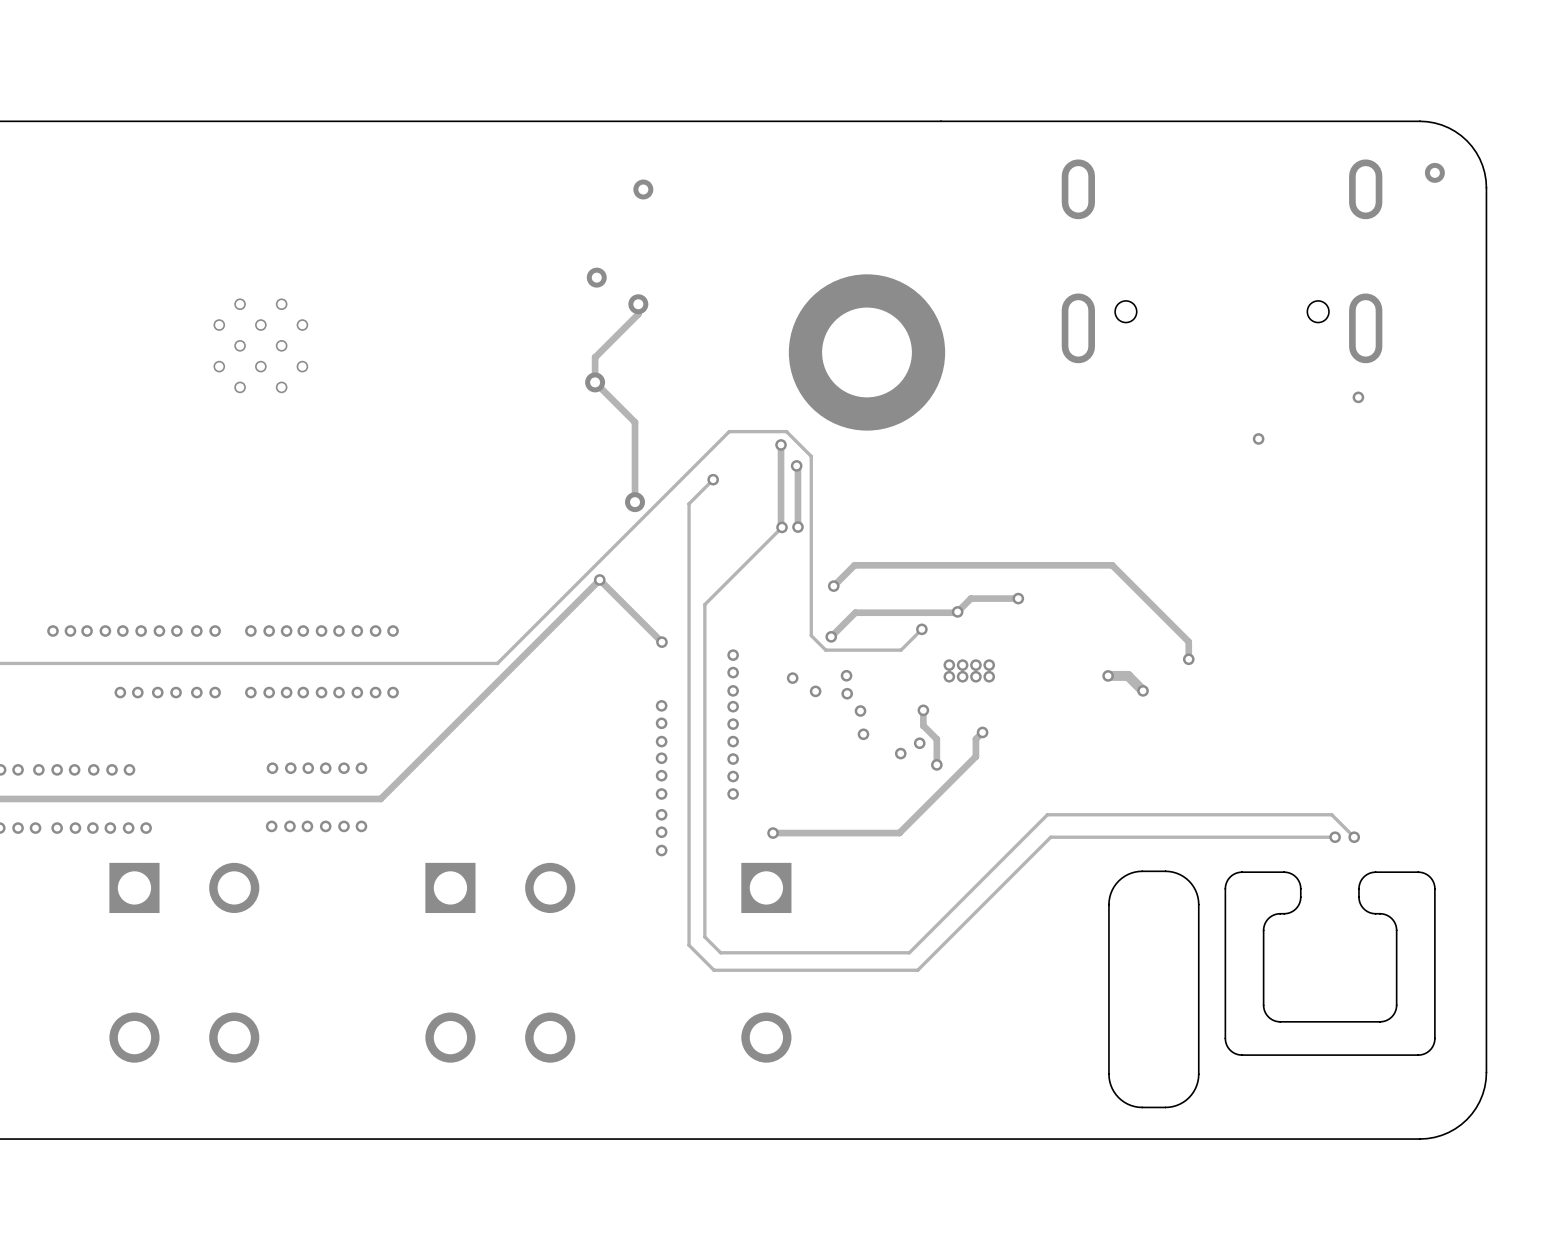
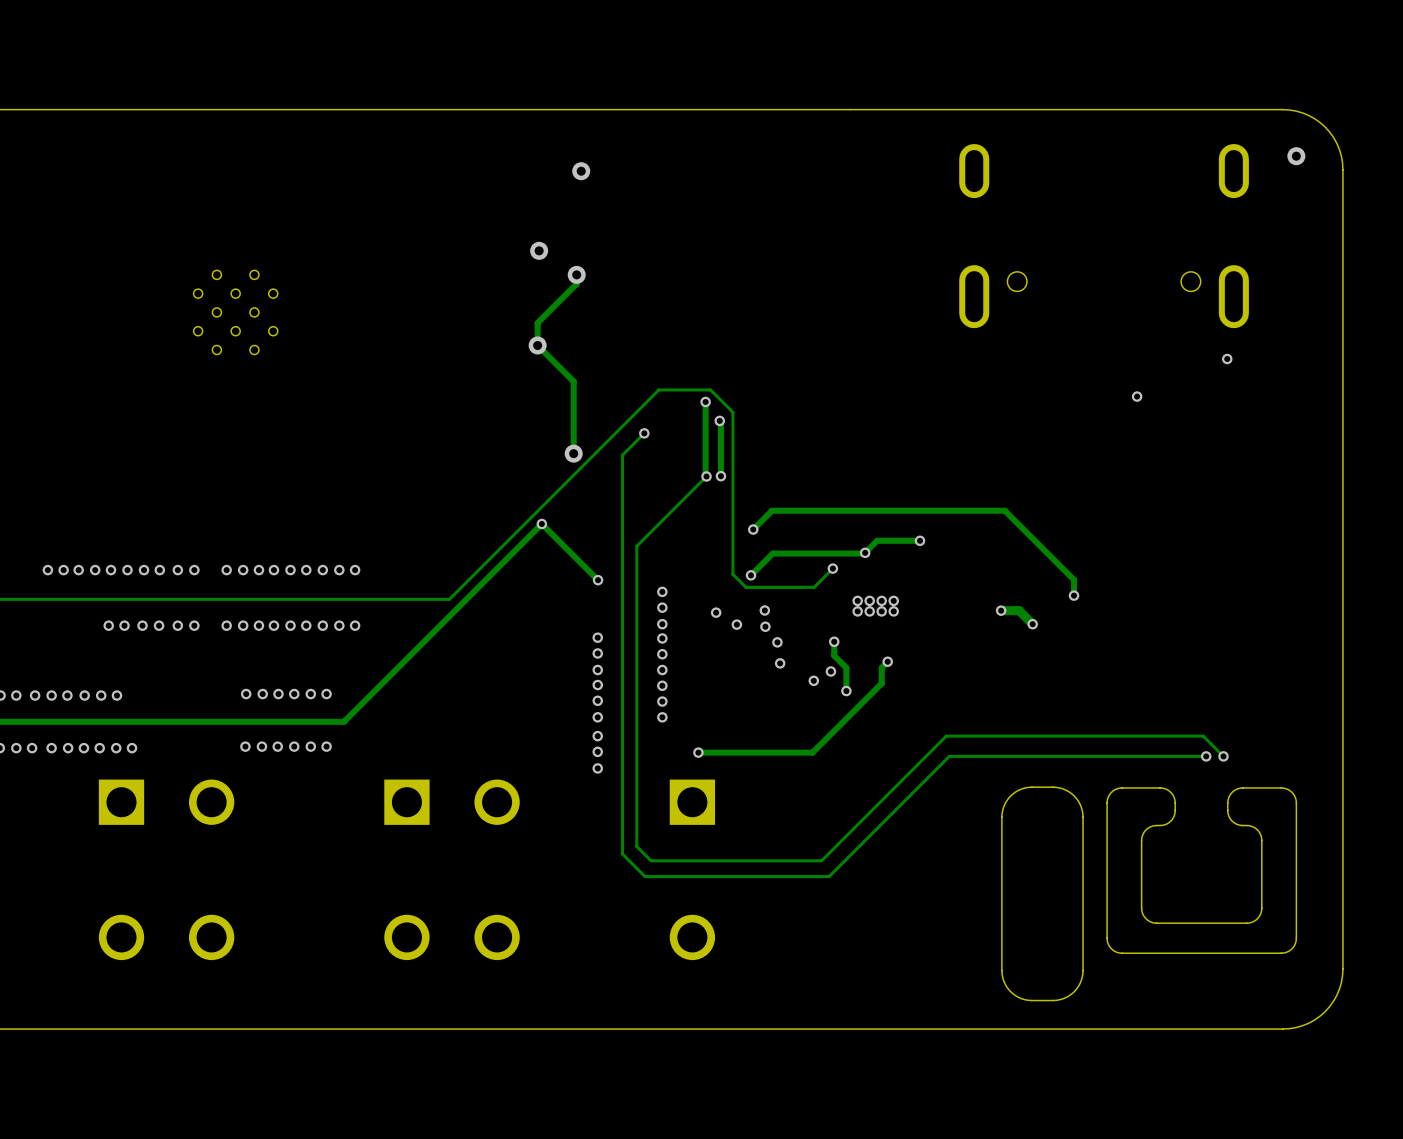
part: (867, 352) -> none

